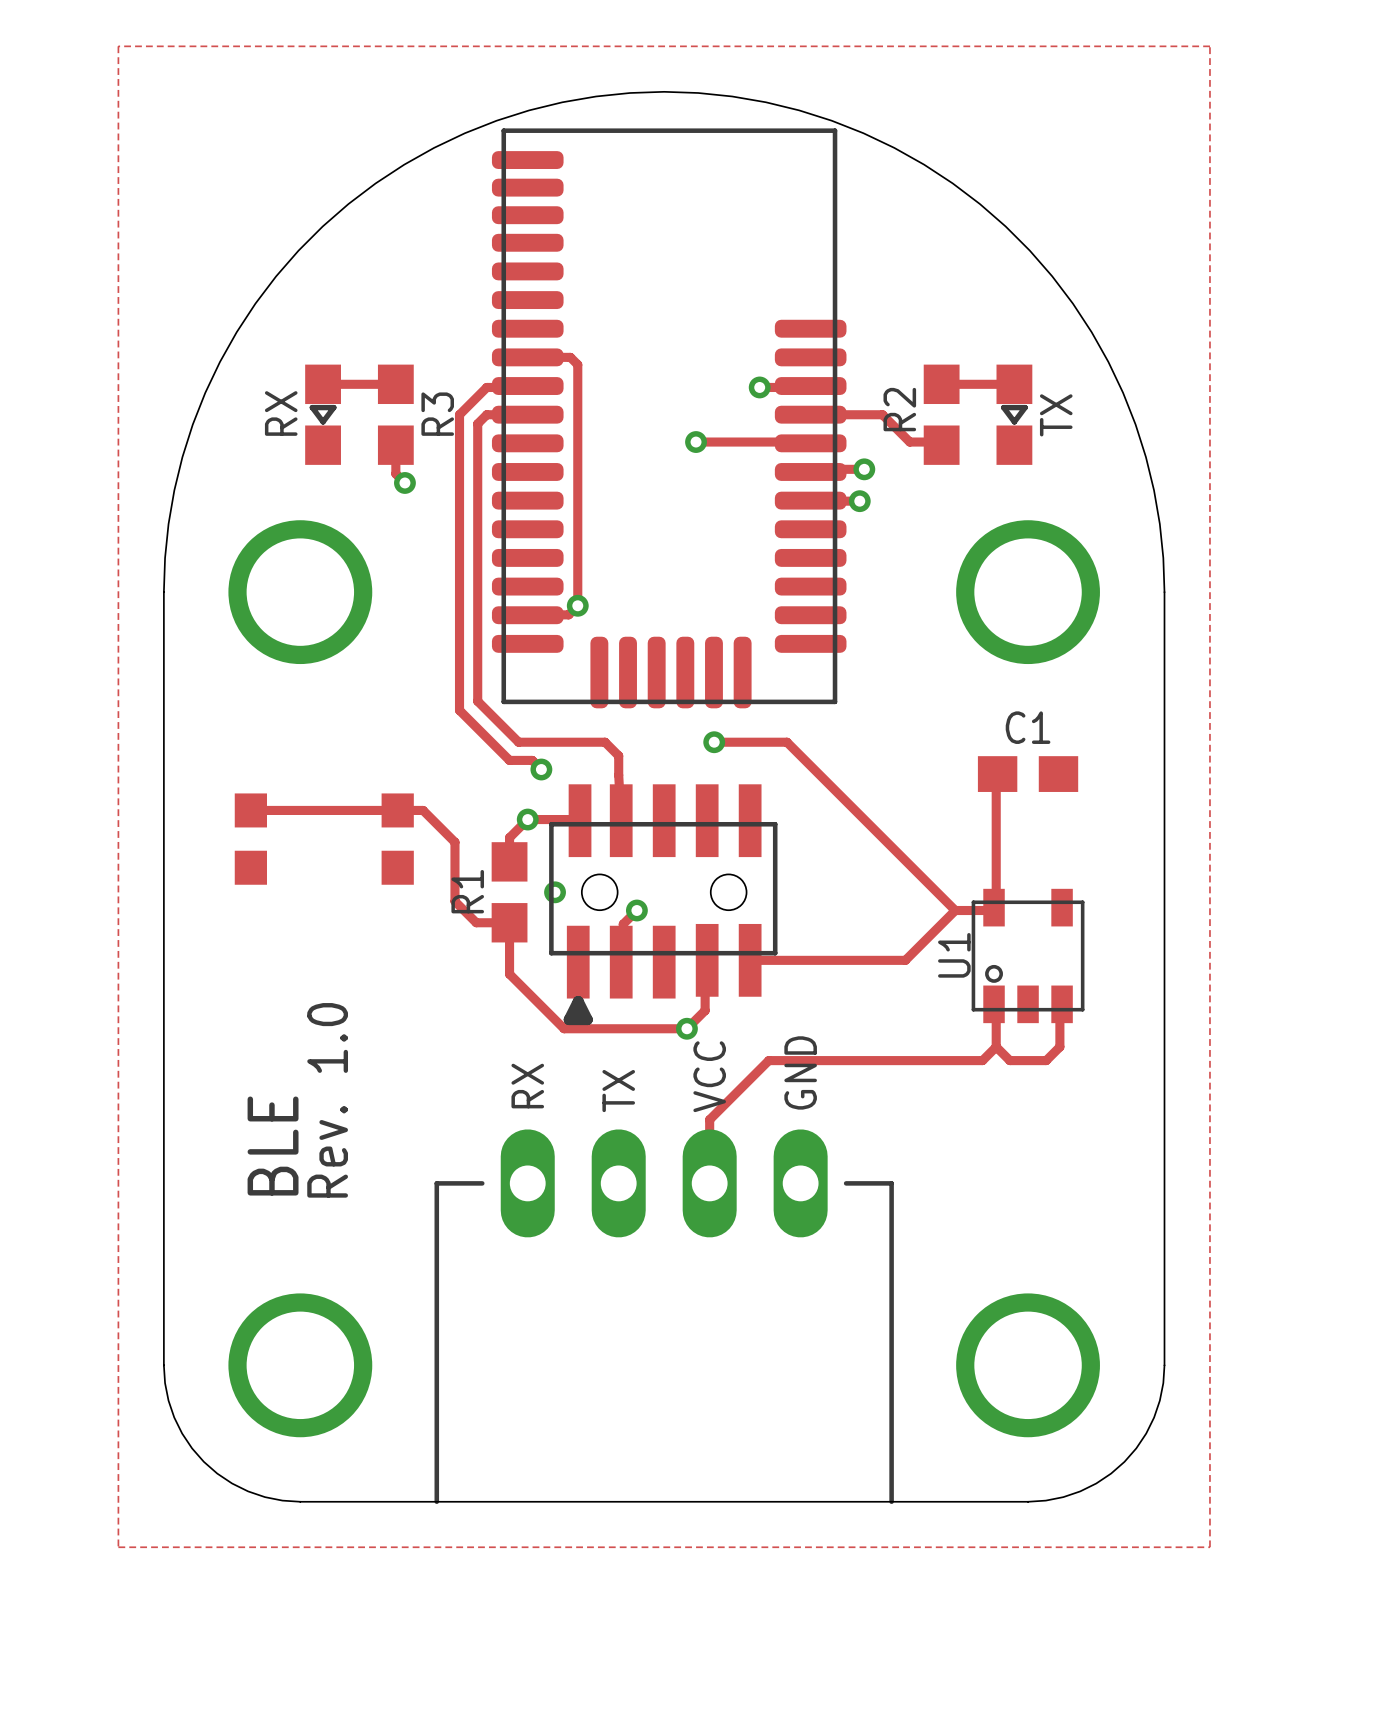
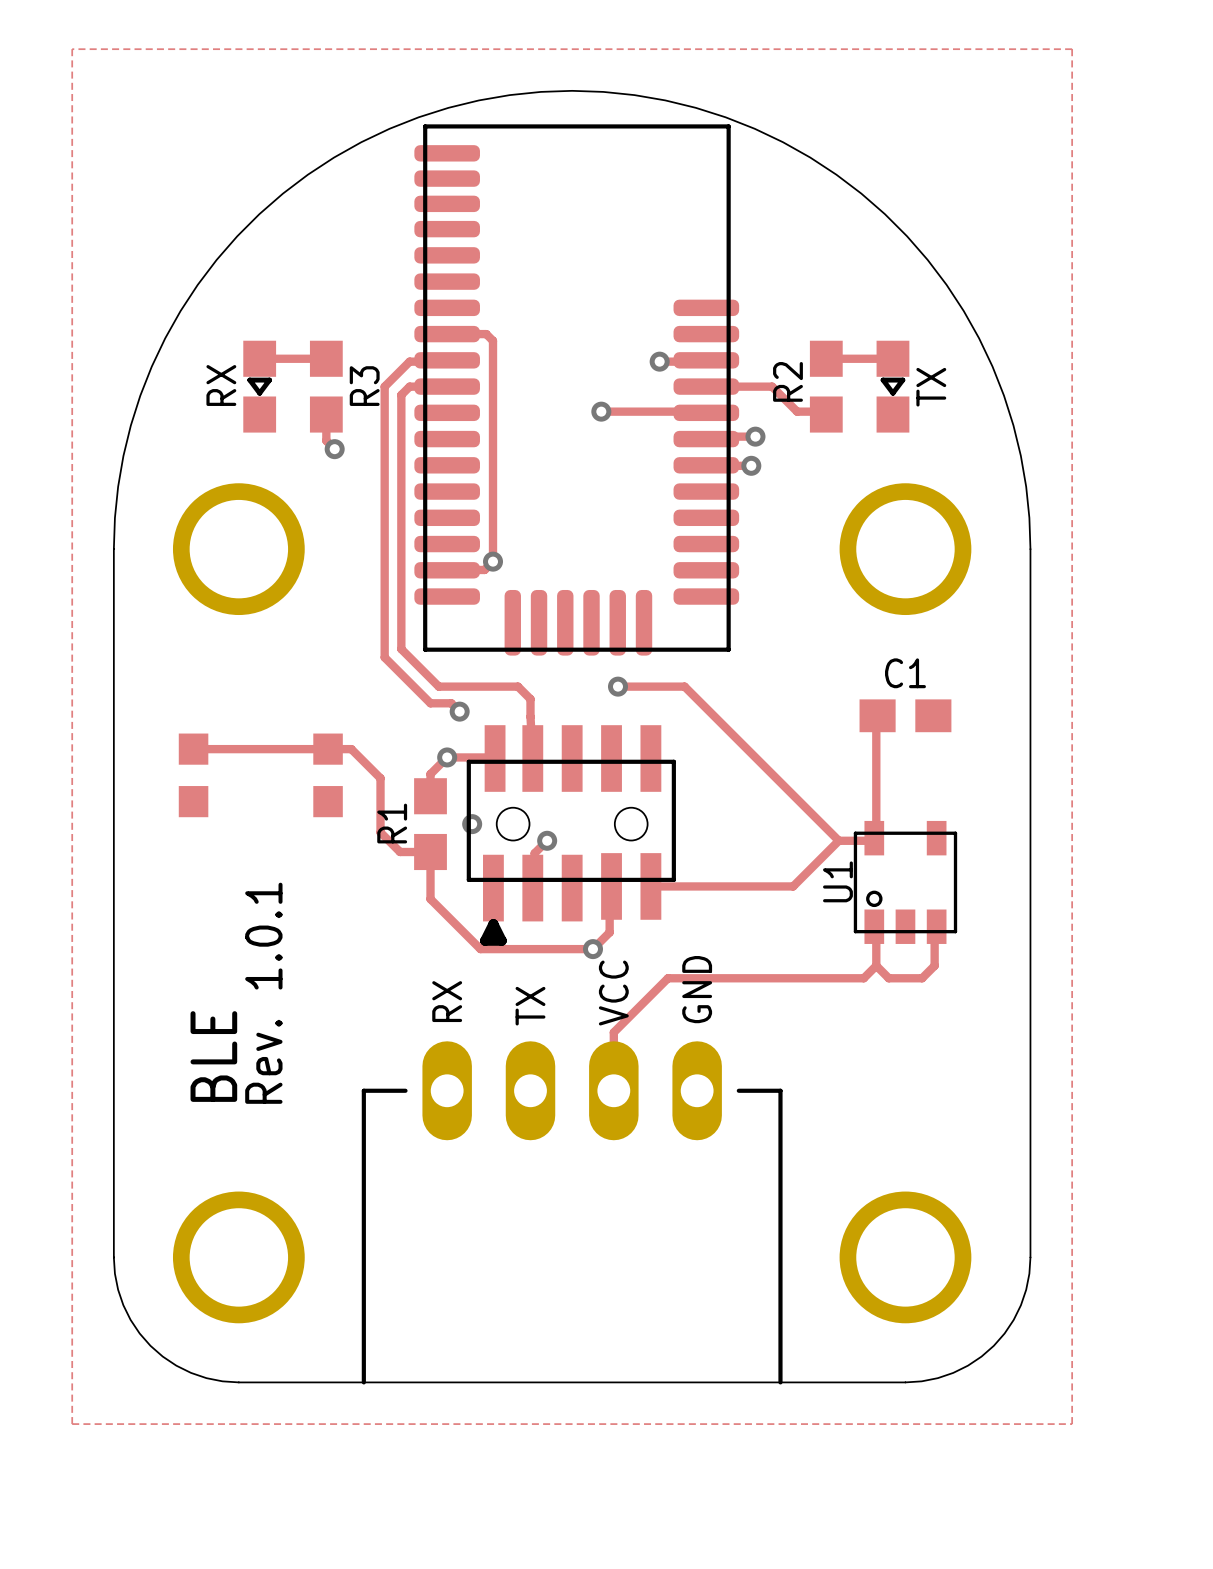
text: Rev. 1.0 (327, 1100) -> Rev. 1.0.1 (263, 993)

